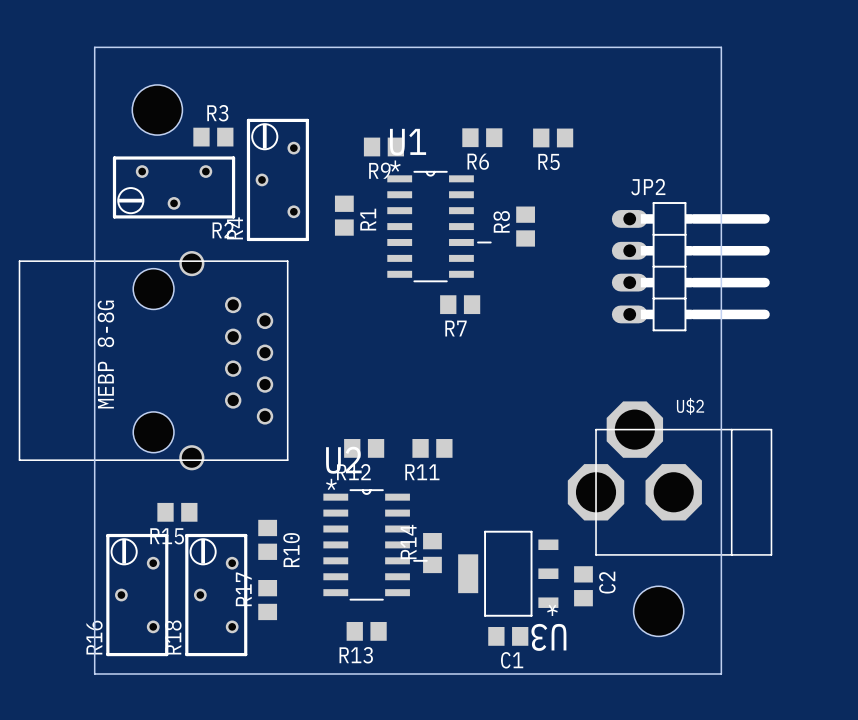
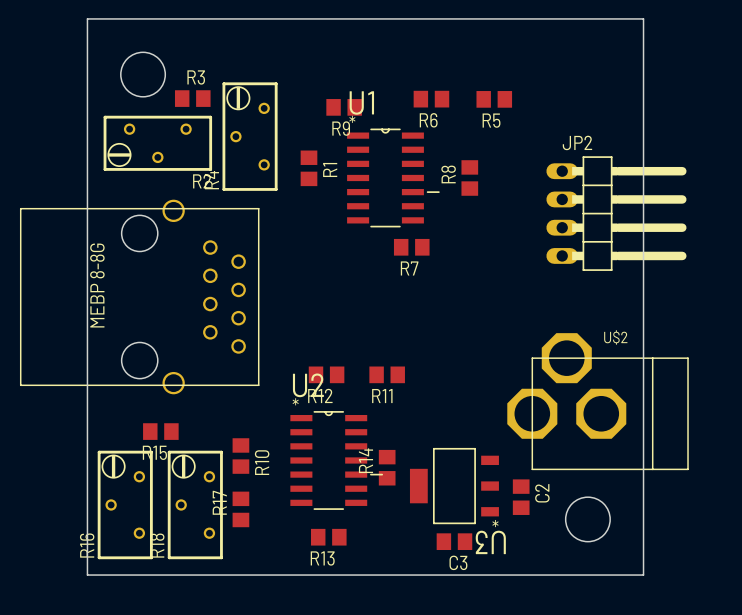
C1 name: C1 (512, 660) -> C3 (458, 562)

